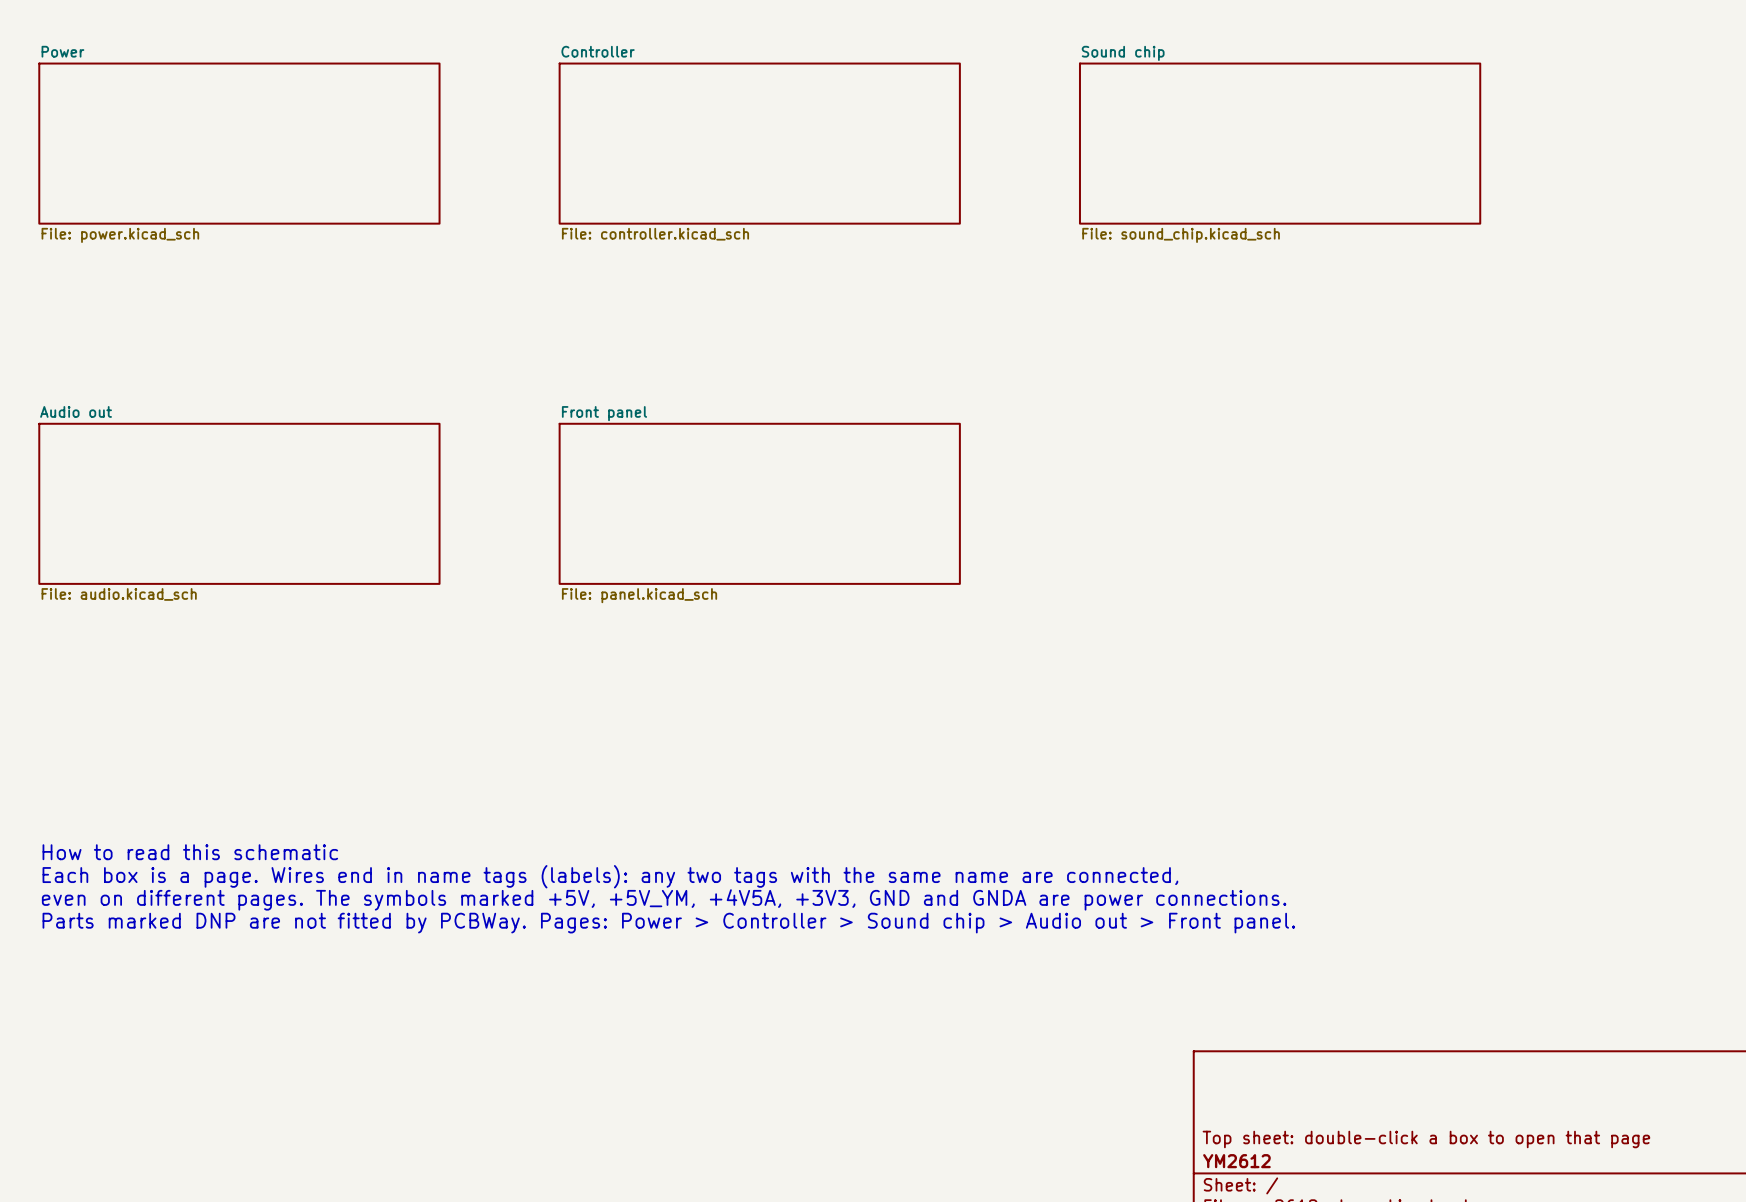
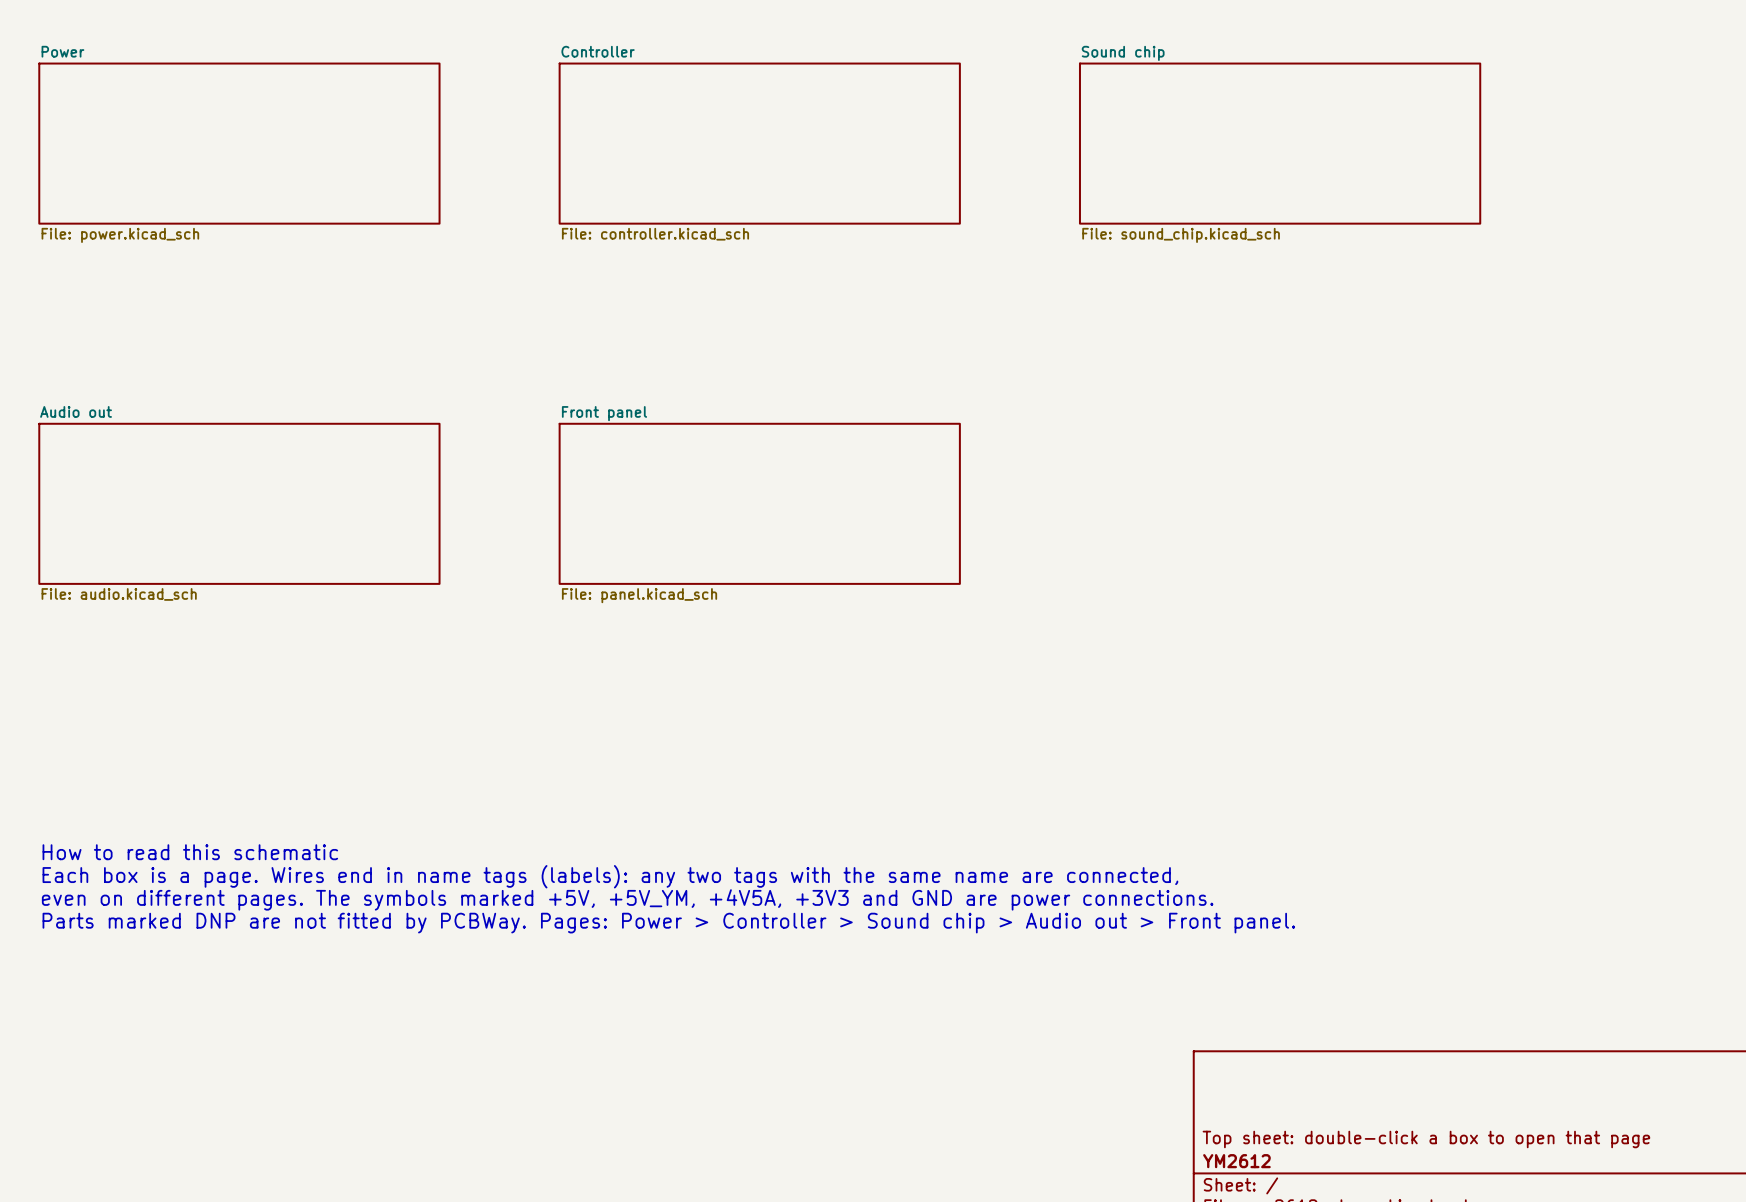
text: even on different pages. The symbols marked +5V, +5V_YM, +4V5A, +3V3, GND and GNDA are power connections. (664, 899) -> even on different pages. The symbols marked +5V, +5V_YM, +4V5A, +3V3 and GND are power connections. (627, 899)

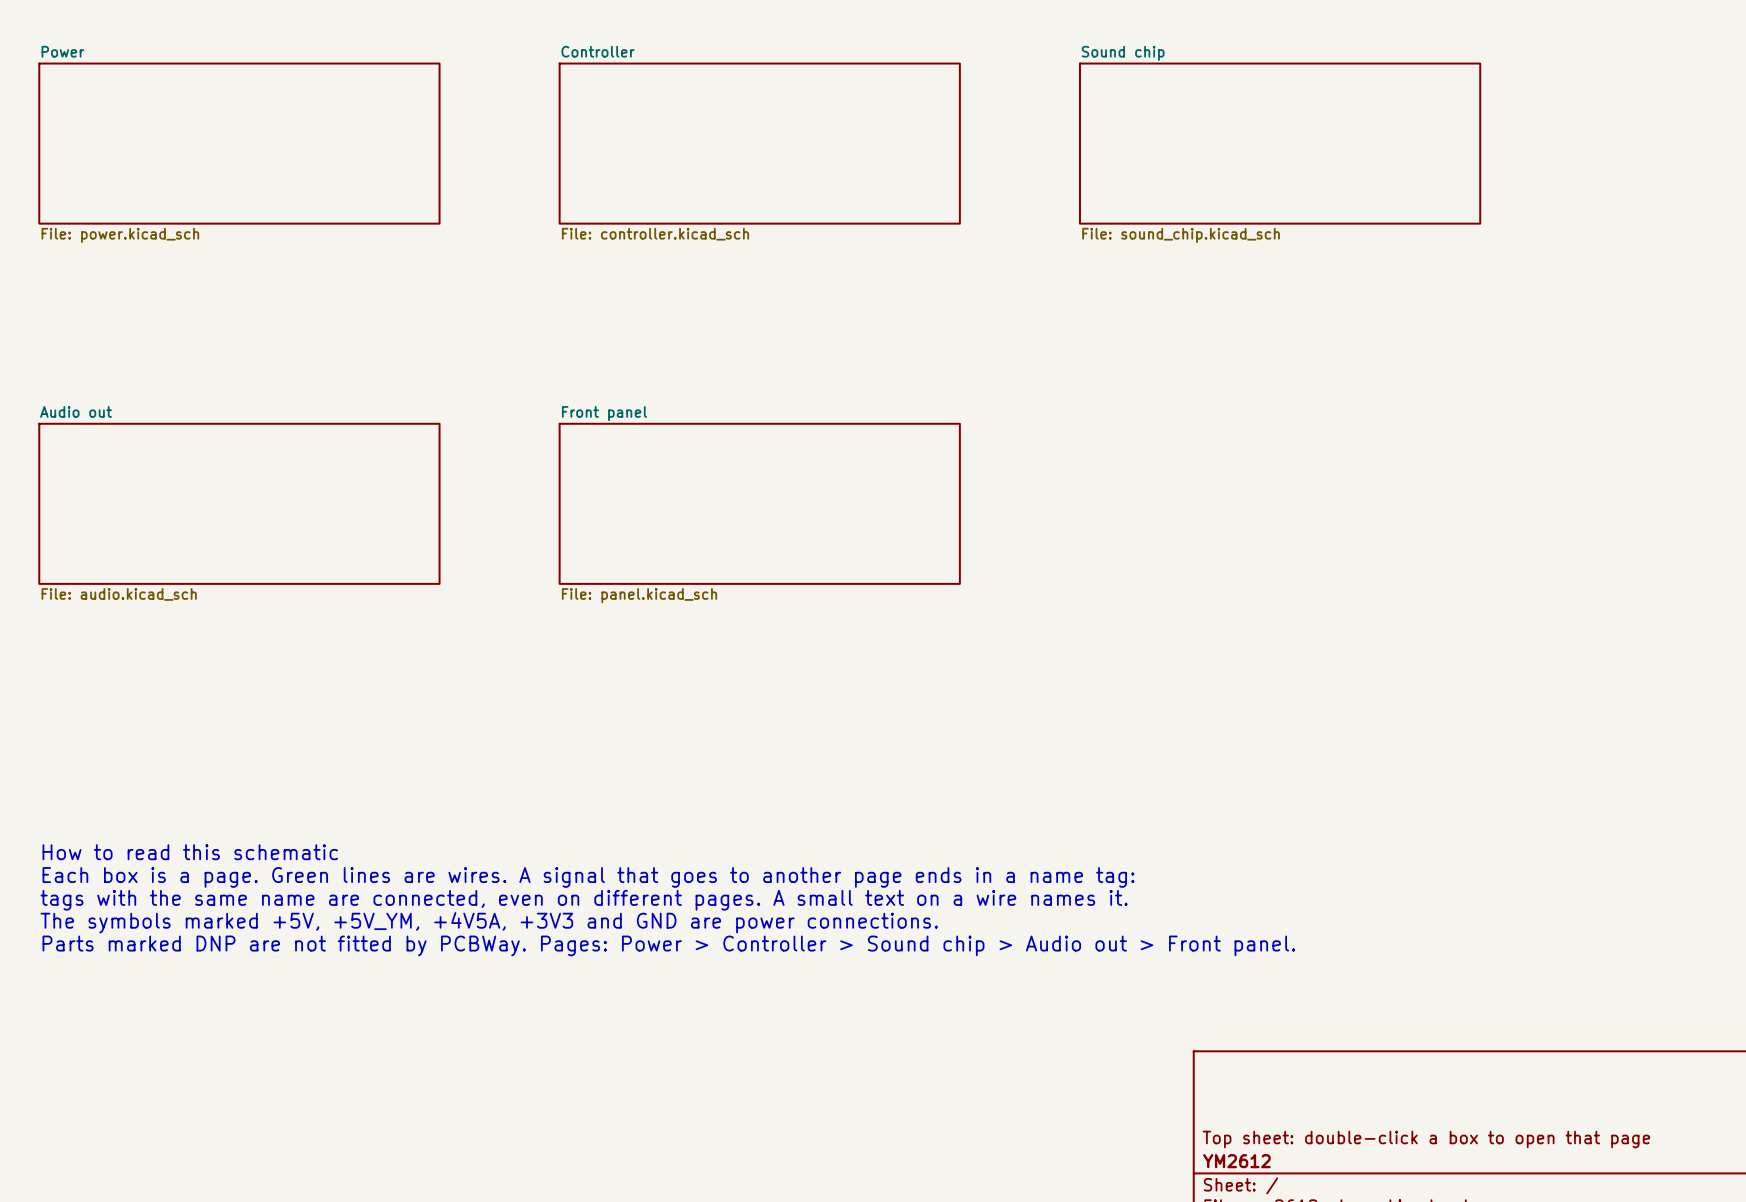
text: Each box is a page. Wires end in name tags (labels): any two tags with the same name are connected, (610, 876) -> Each box is a page. Green lines are wires. A signal that goes to another page ends in a name tag: (588, 877)
text: even on different pages. The symbols marked +5V, +5V_YM, +4V5A, +3V3 and GND are power connections. (627, 899) -> tags with the same name are connected, even on different pages. A small text on a wire names it. (584, 900)
text: Parts marked DNP are not fitted by PCBWay. Pages: Power > Controller > Sound chip > Audio out > Front panel. (668, 923) -> The symbols marked +5V, +5V_YM, +4V5A, +3V3 and GND are power connections. (489, 922)
text: none -> Parts marked DNP are not fitted by PCBWay. Pages: Power > Controller > Sound chip > Audio out > Front panel. (668, 945)

